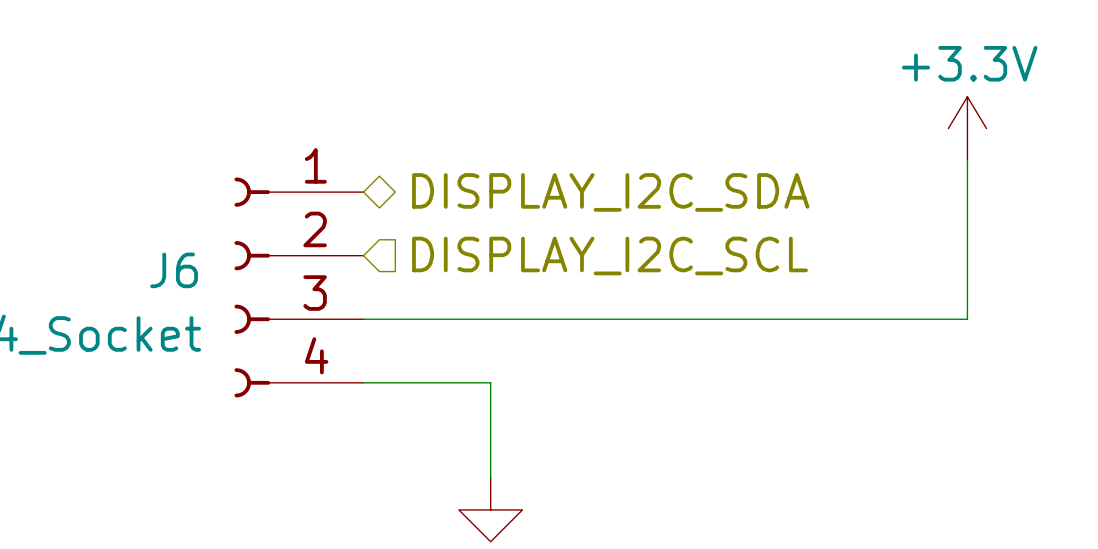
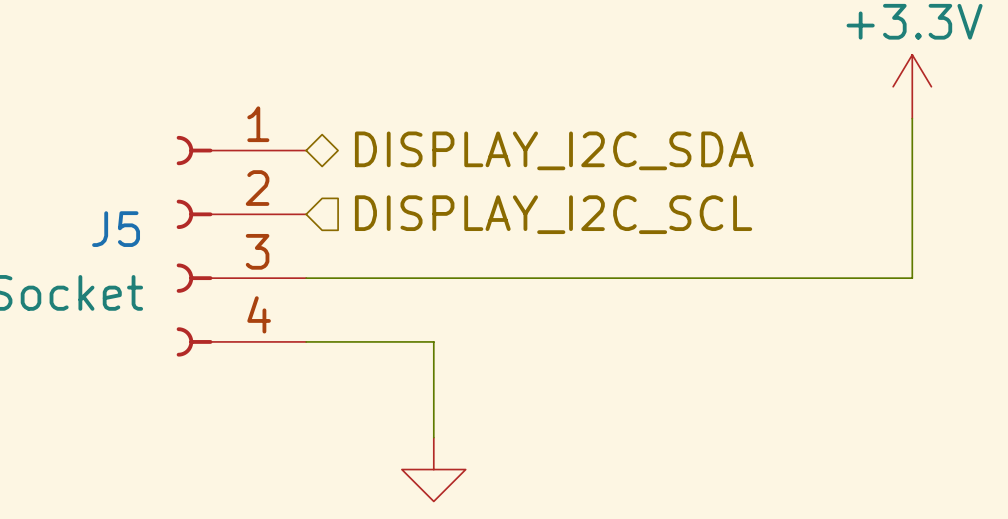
J6 name: J6 (174, 270) -> J5 (116, 229)

